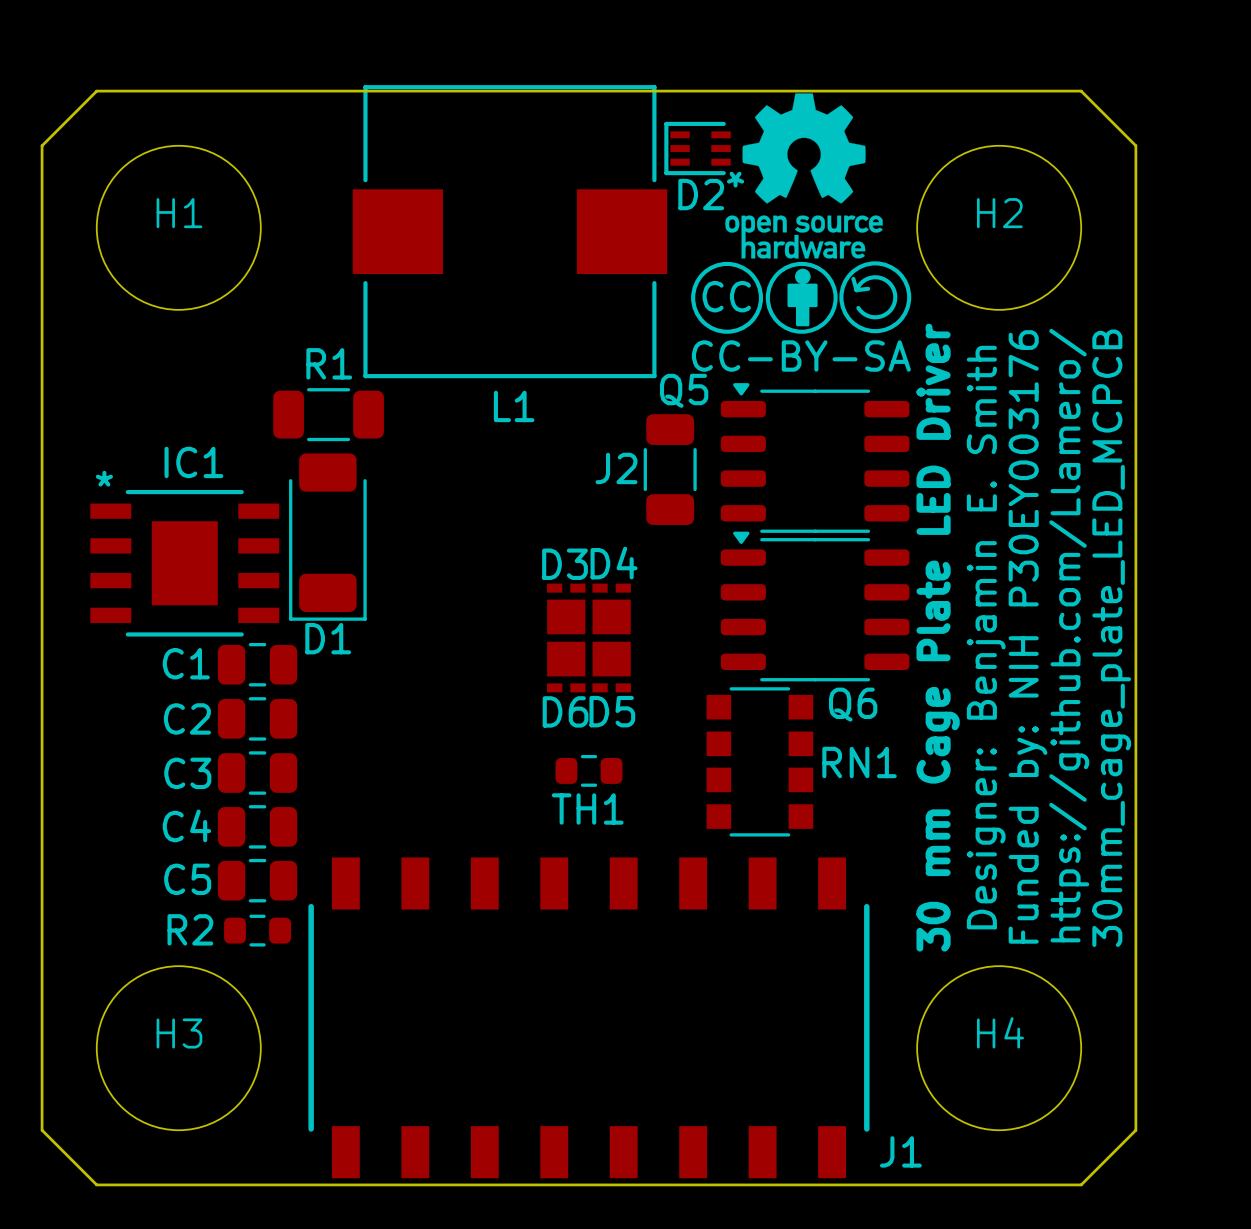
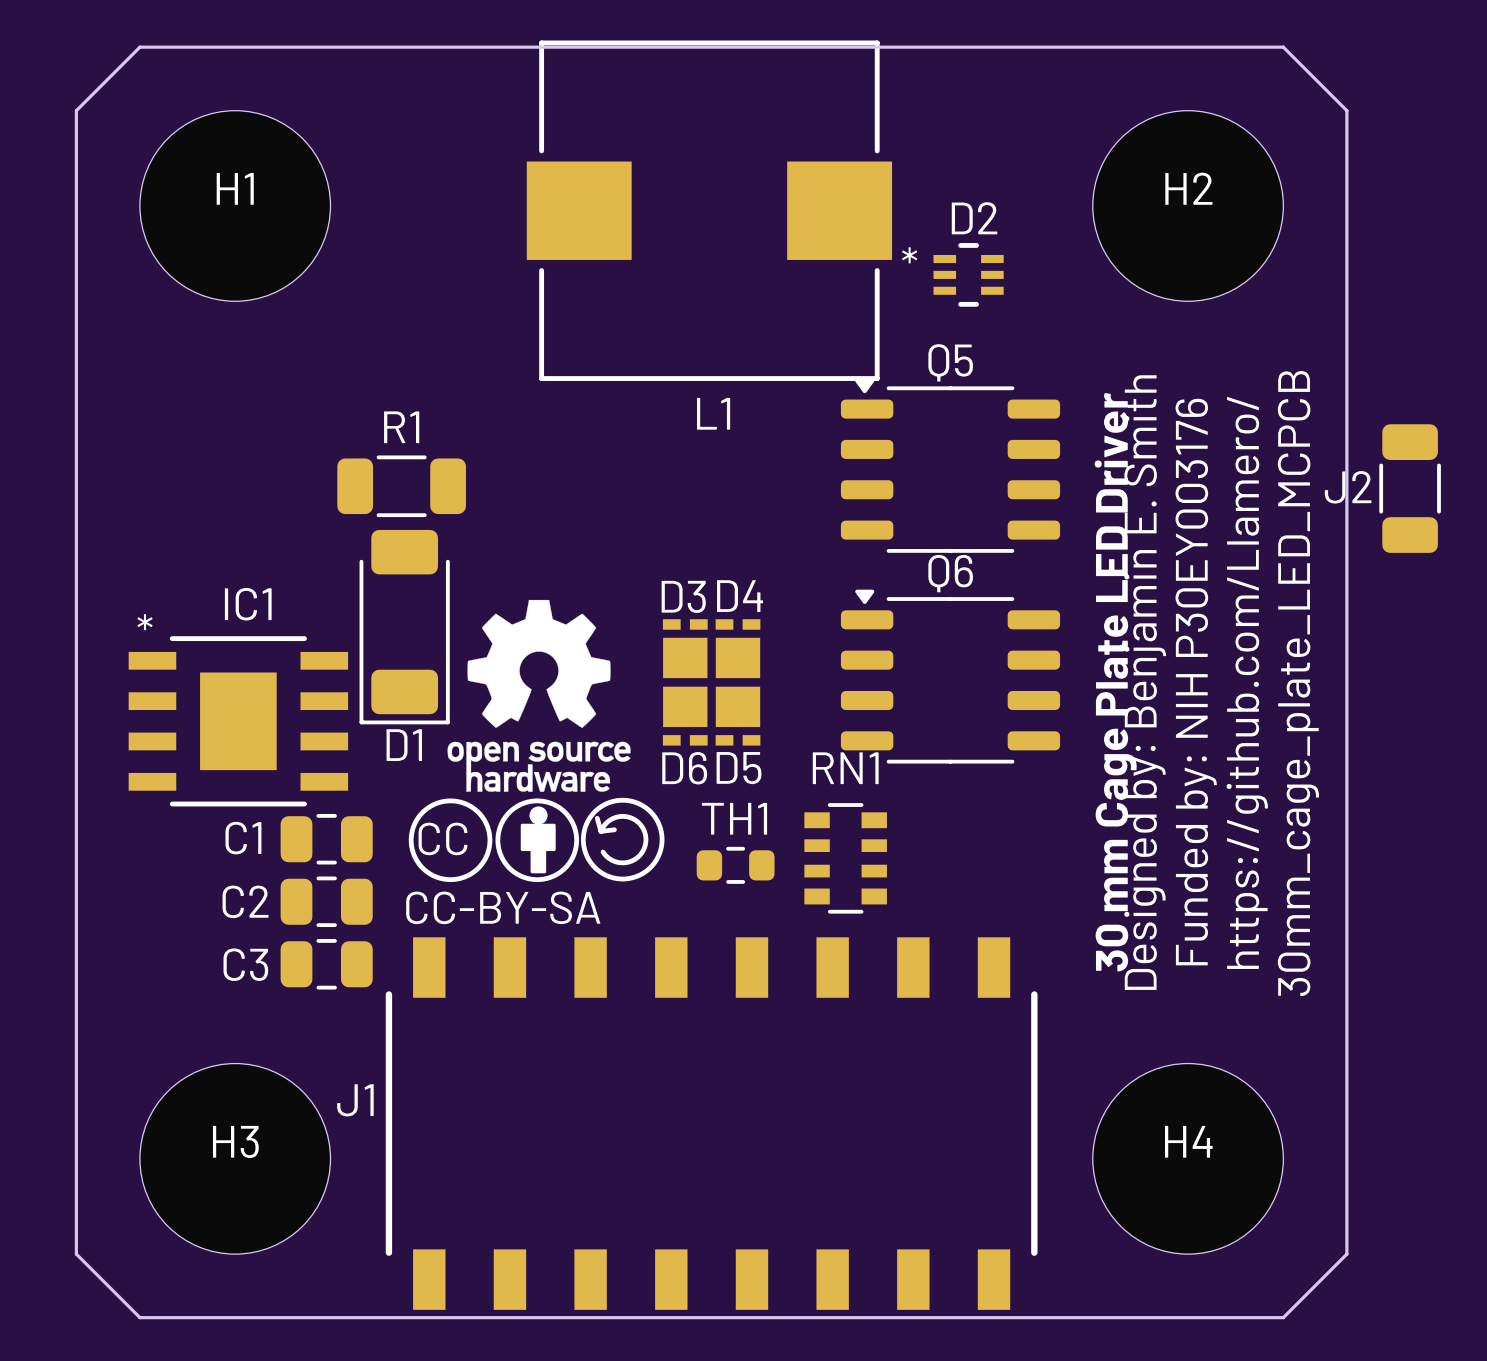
D2 footprint: [664, 121, 731, 176] -> [933, 243, 1004, 307]
drawing position: (804, 175) -> (539, 695)
D2 name position: D2 (701, 194) -> D2 (974, 218)
L1 position: (509, 231) -> (709, 210)
drawing position: (801, 297) -> (536, 839)
Q5 name position: Q5 (684, 390) -> Q5 (950, 362)
R1 position: (328, 414) -> (401, 486)
Q5 position: (815, 458) -> (950, 465)
J2 position: (670, 469) -> (1410, 488)
D1 position: (327, 537) -> (404, 627)
IC1 position: (184, 563) -> (238, 721)
Q6 position: (815, 606) -> (950, 676)
text position: https://github.com/Llamero/ (1069, 635) -> https://github.com/Llamero/ (1247, 682)
text position: Funded by: NIH P30EY003176 (1028, 636) -> Funded by: NIH P30EY003176 (1196, 682)
text: Designer: Benjamin E. Smith (986, 637) -> Designed by: Benjamin E. Smith (1145, 682)
text position: 30mm_cage_plate_LED_MCPCB (1111, 638) -> 30mm_cage_plate_LED_MCPCB (1298, 683)
C1: (257, 664) -> none
RN1 footprint: [706, 687, 814, 837] -> [804, 803, 887, 914]
Q6 name position: Q6 (853, 704) -> Q6 (950, 573)
C2: (257, 718) -> none
RN1 name position: RN1 (859, 762) -> RN1 (845, 768)
TH1 position: (588, 770) -> (735, 865)
C3 name: C3 (187, 773) -> C1 (243, 838)
TH1 name position: TH1 (587, 808) -> TH1 (734, 818)
C4 name: C4 (186, 825) -> C2 (245, 901)
C5 name: C5 (187, 879) -> C3 (245, 964)
R2: (257, 930) -> none
J1 name position: J1 (900, 1151) -> J1 (355, 1100)

